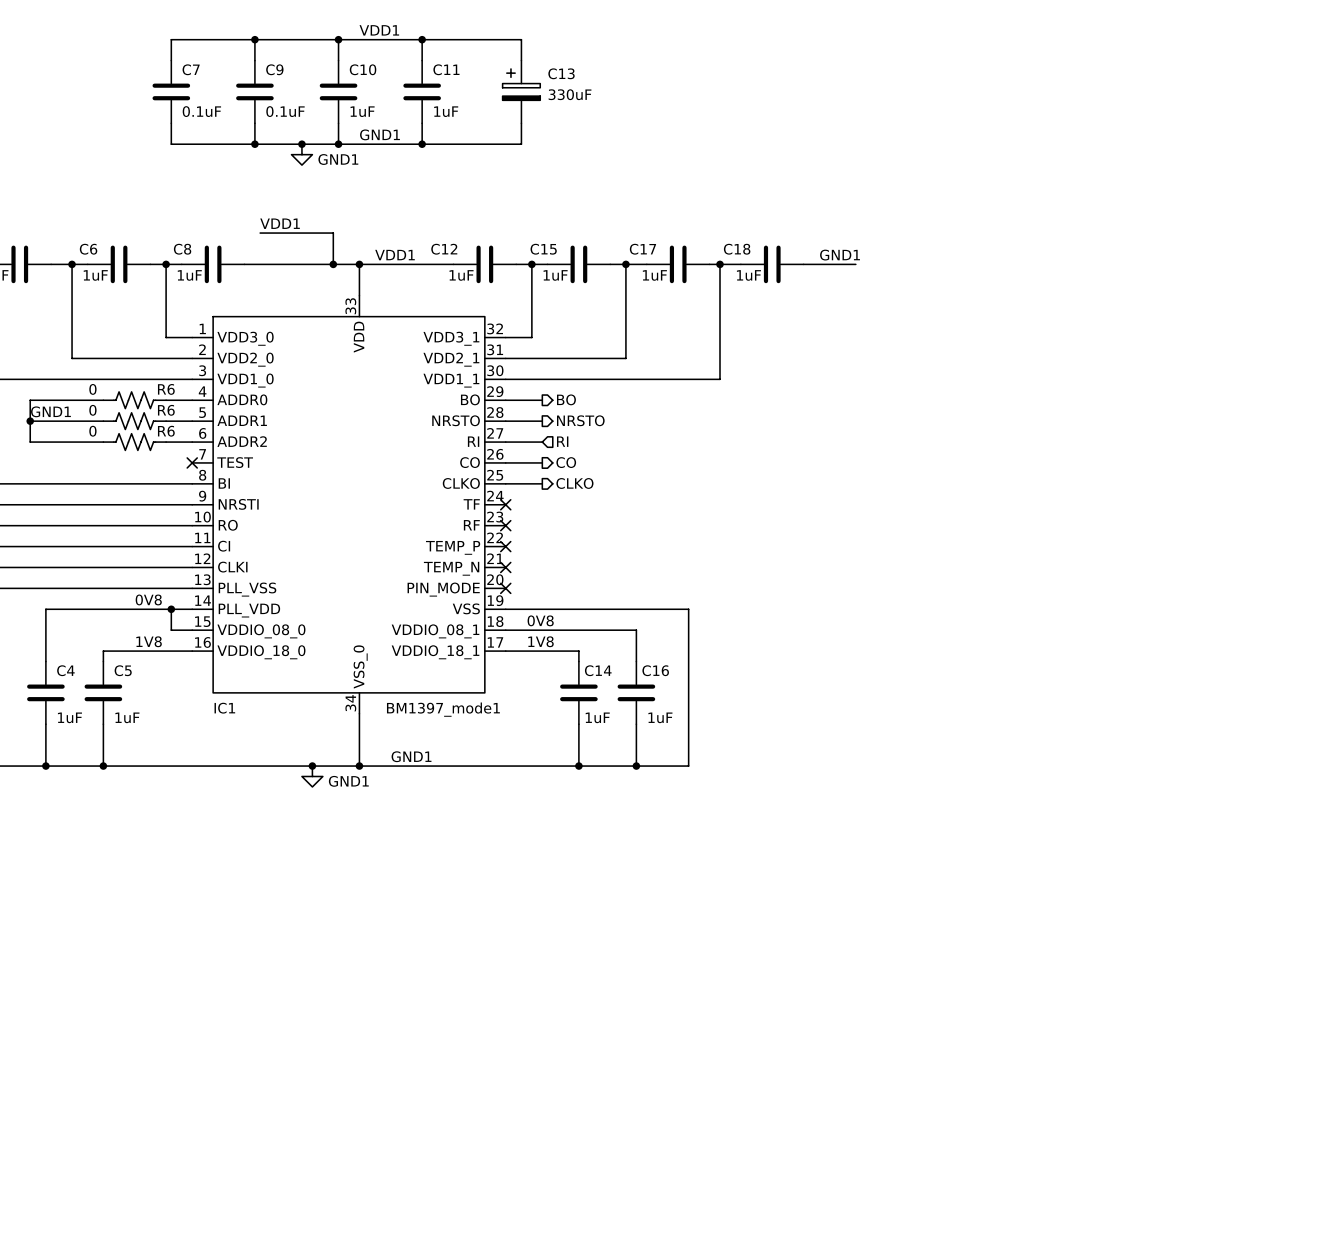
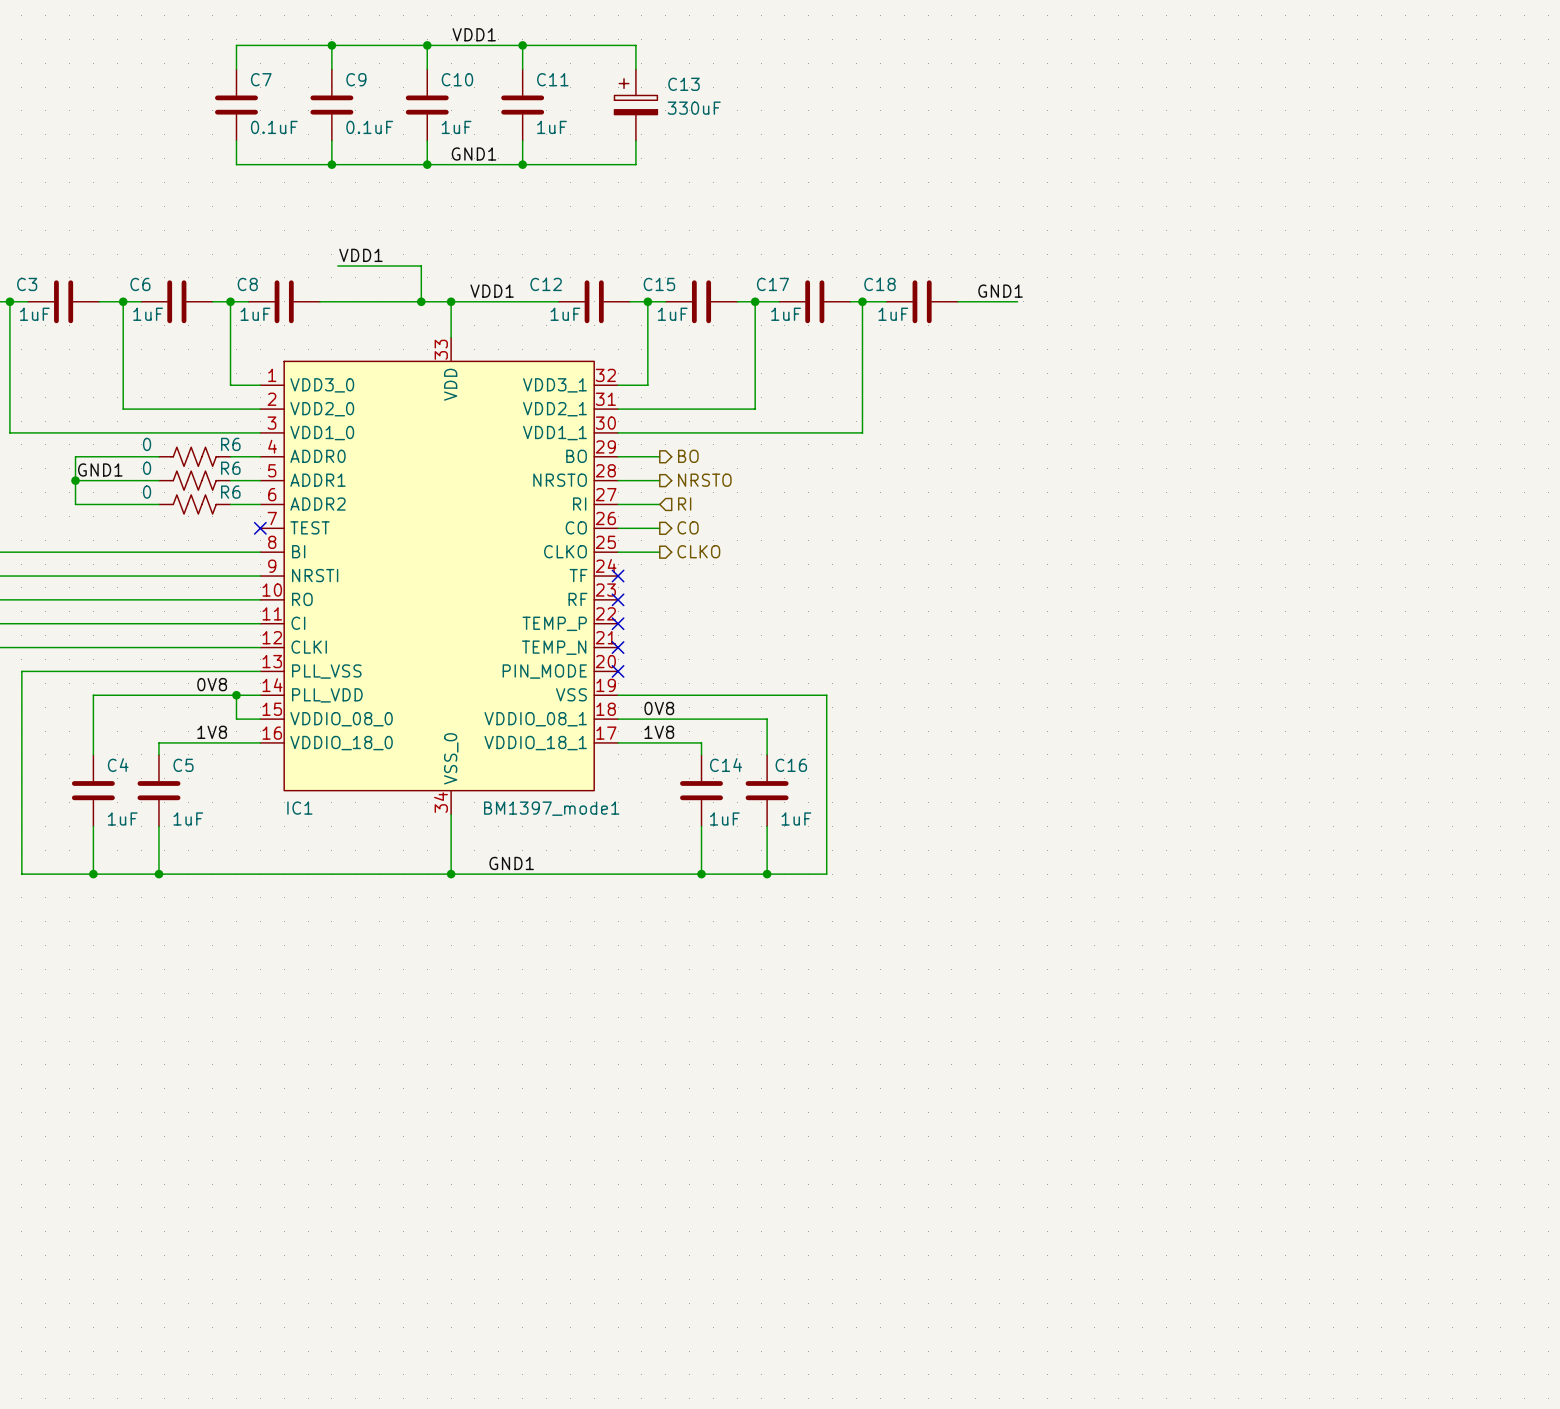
junction: (301, 144) -> none
power symbol: GND1 (301, 154) -> none
junction: (312, 766) -> none
power symbol: GND1 (312, 776) -> none

